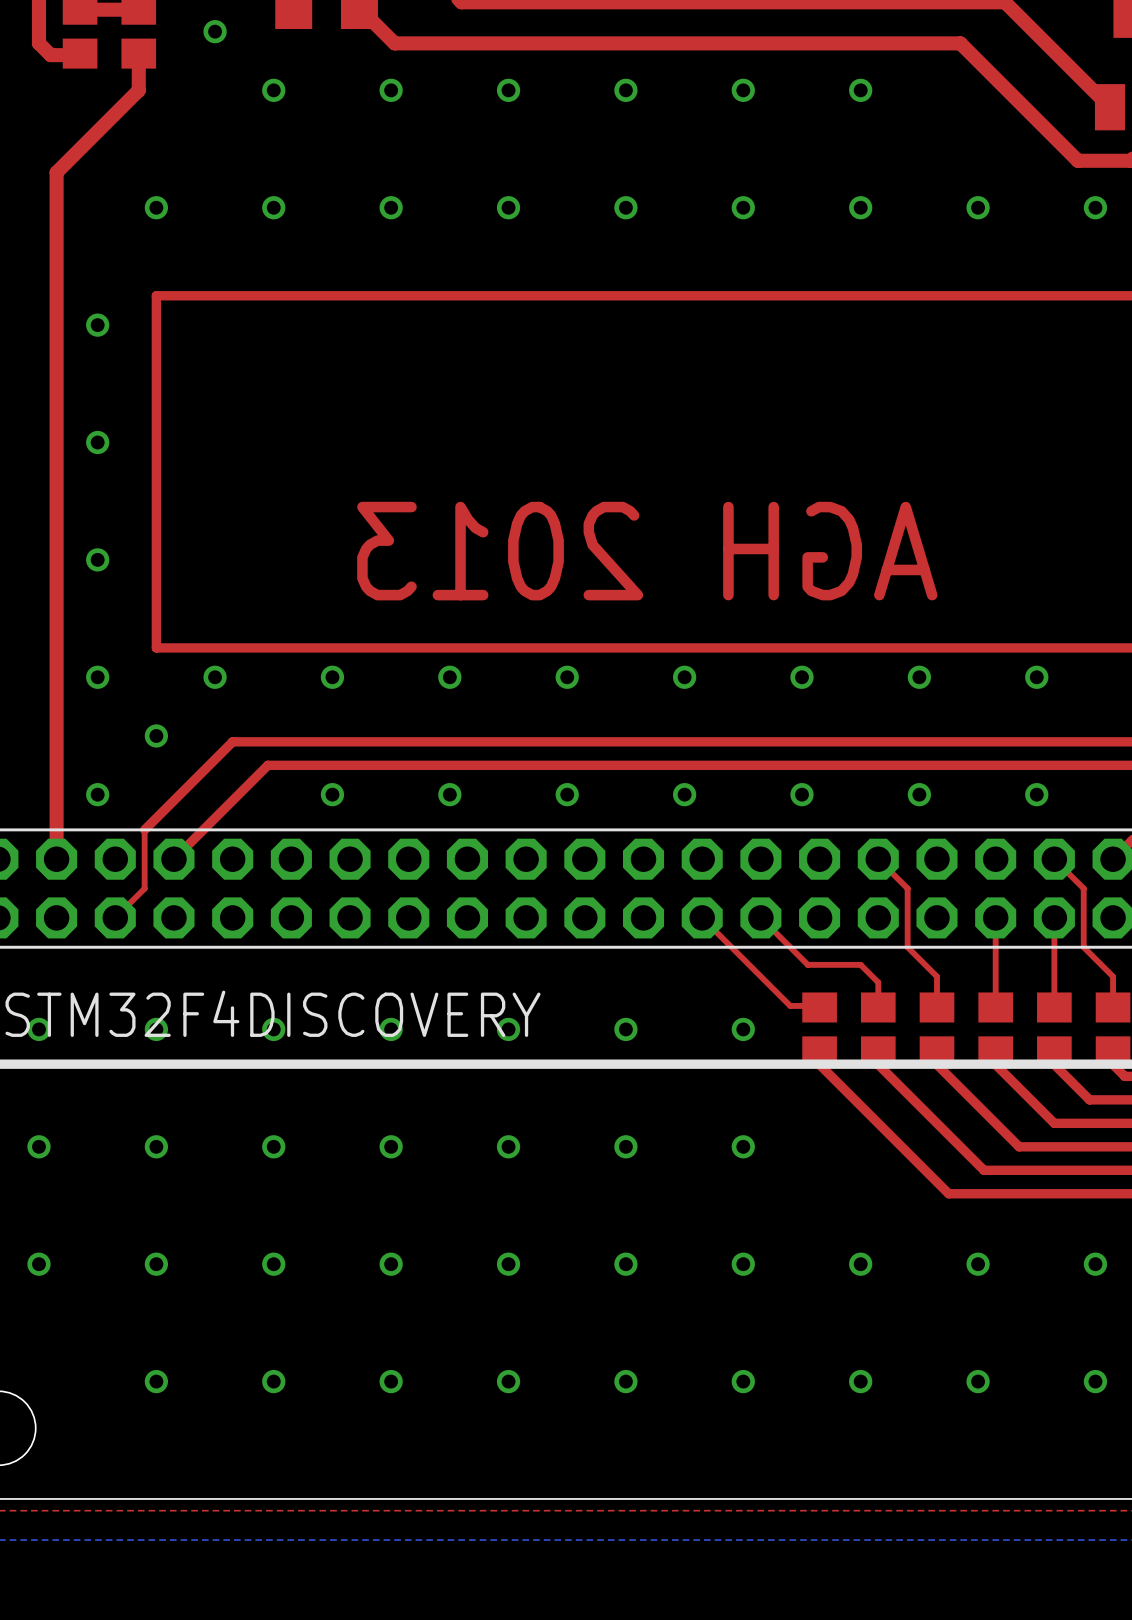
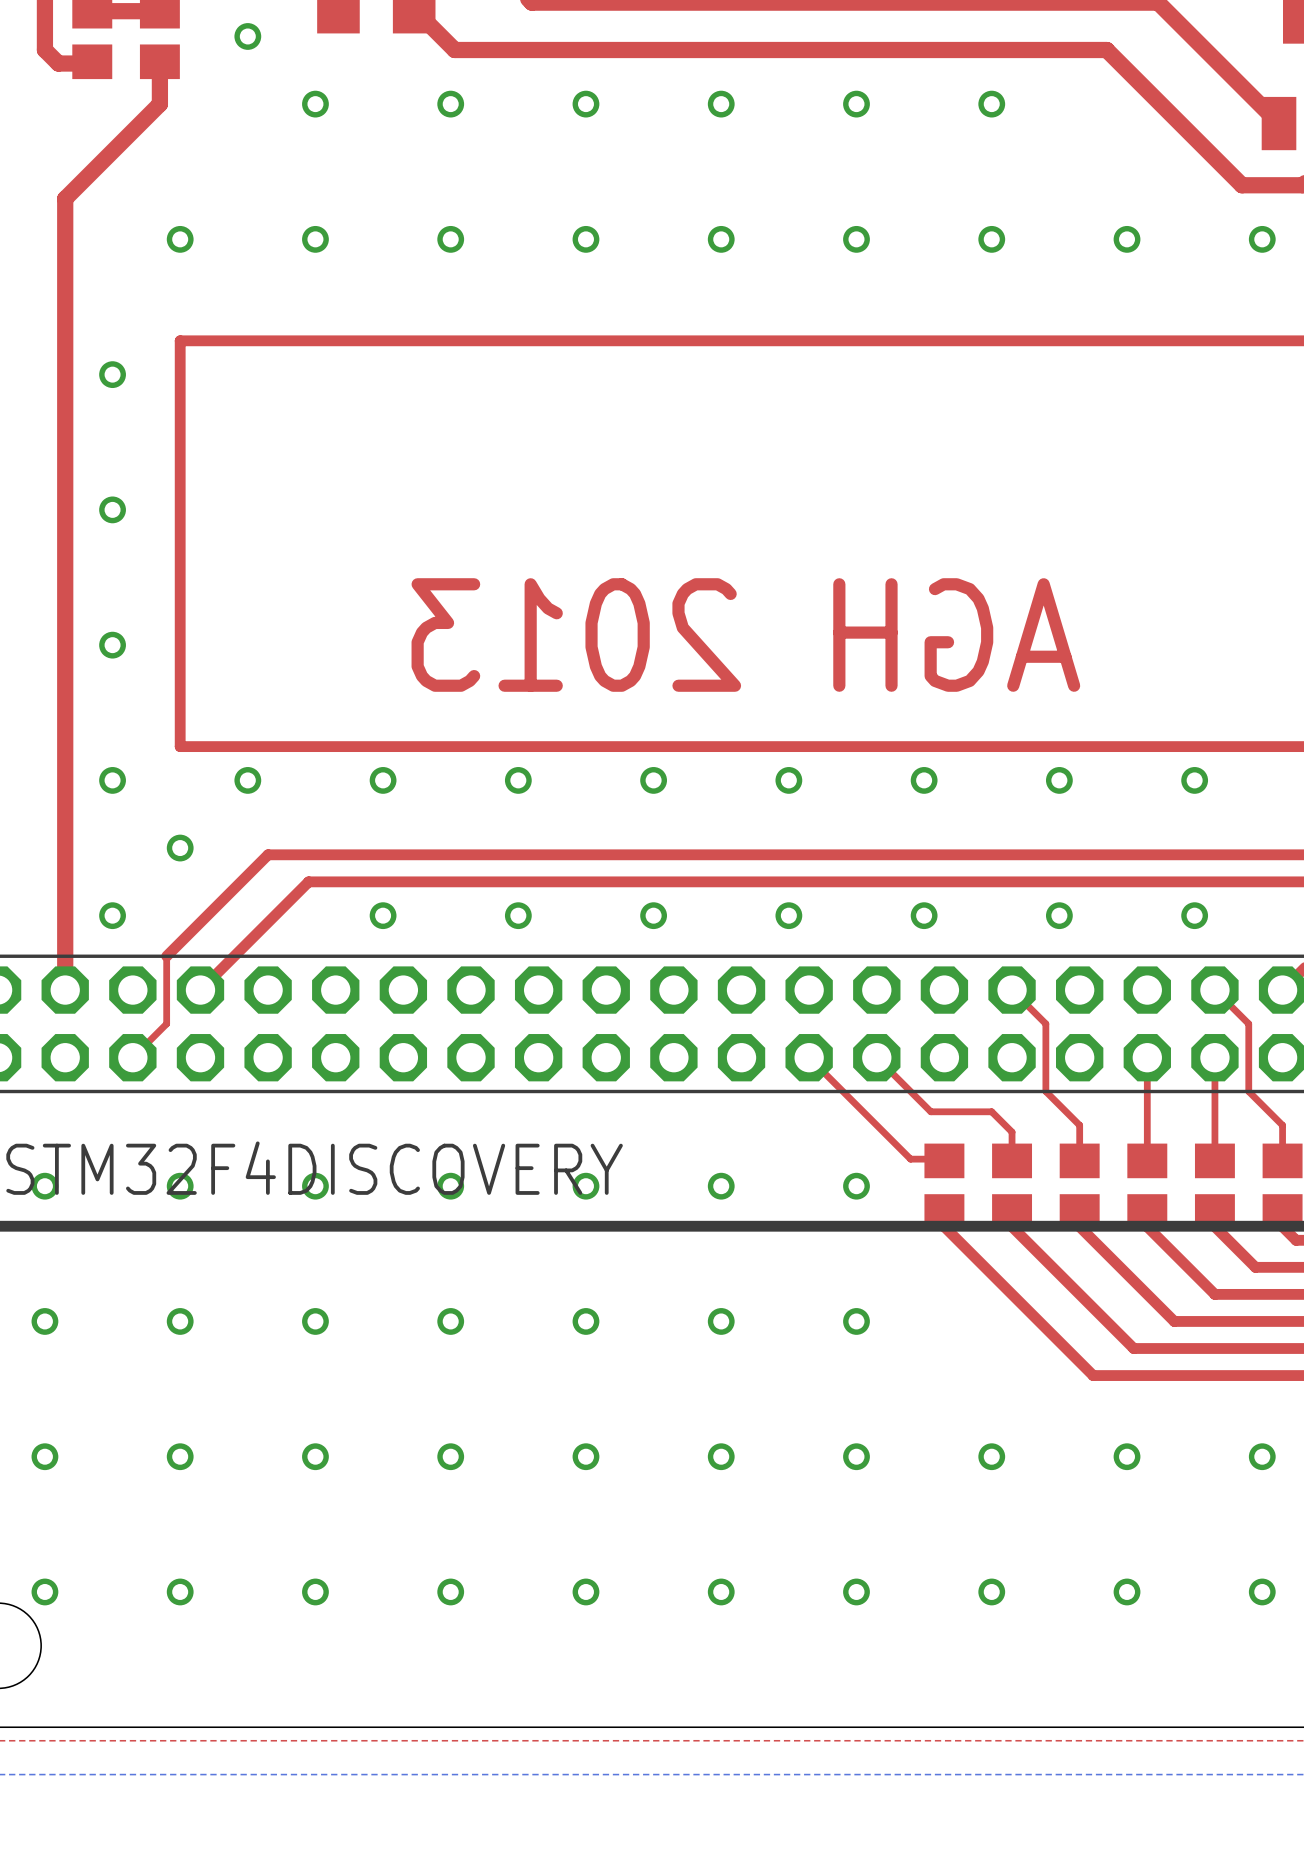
via: none -> (44, 1591)

